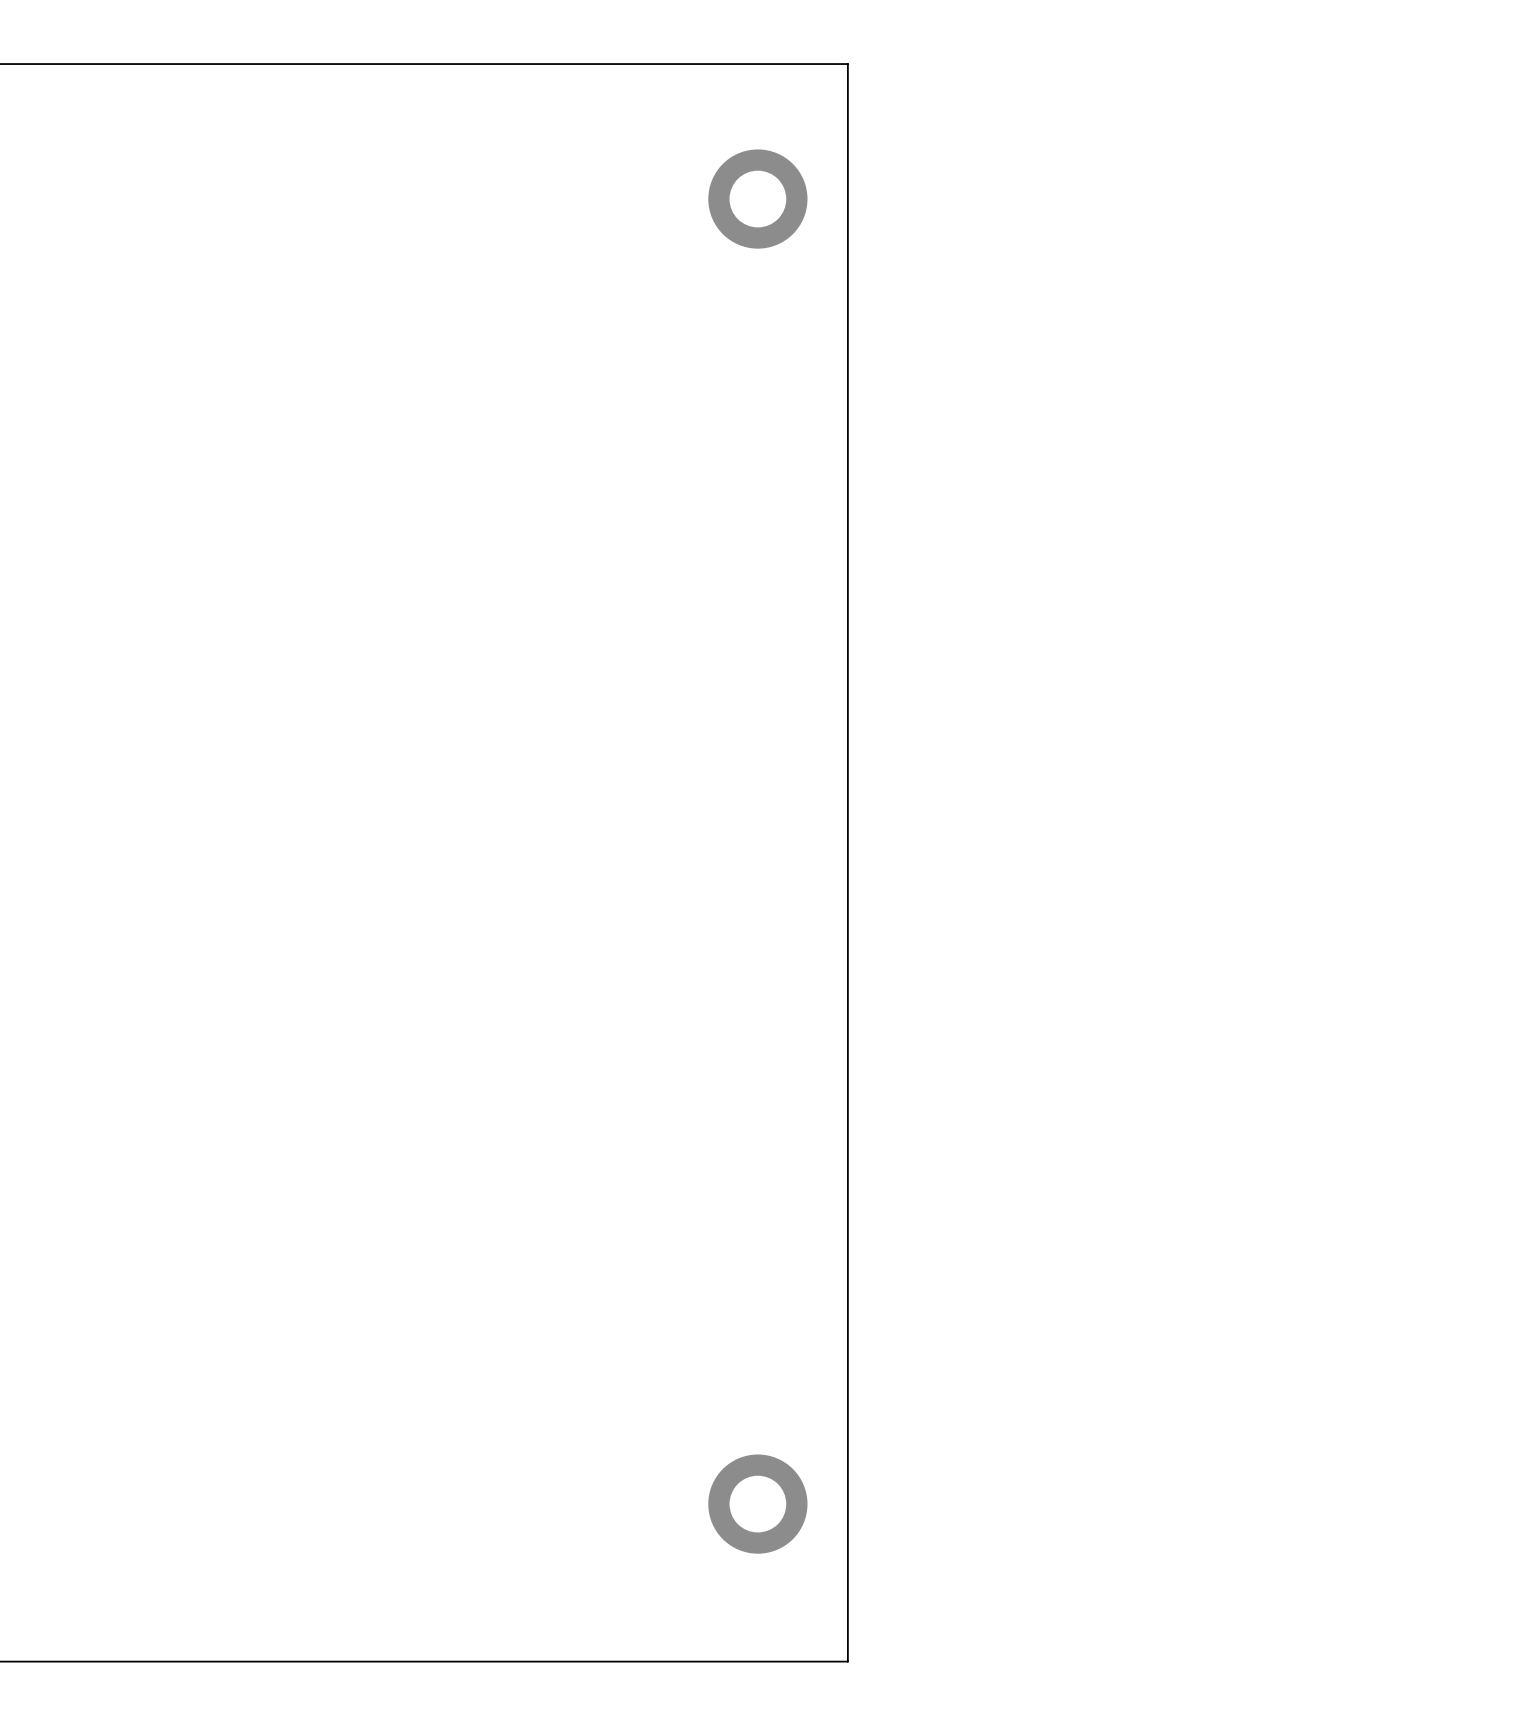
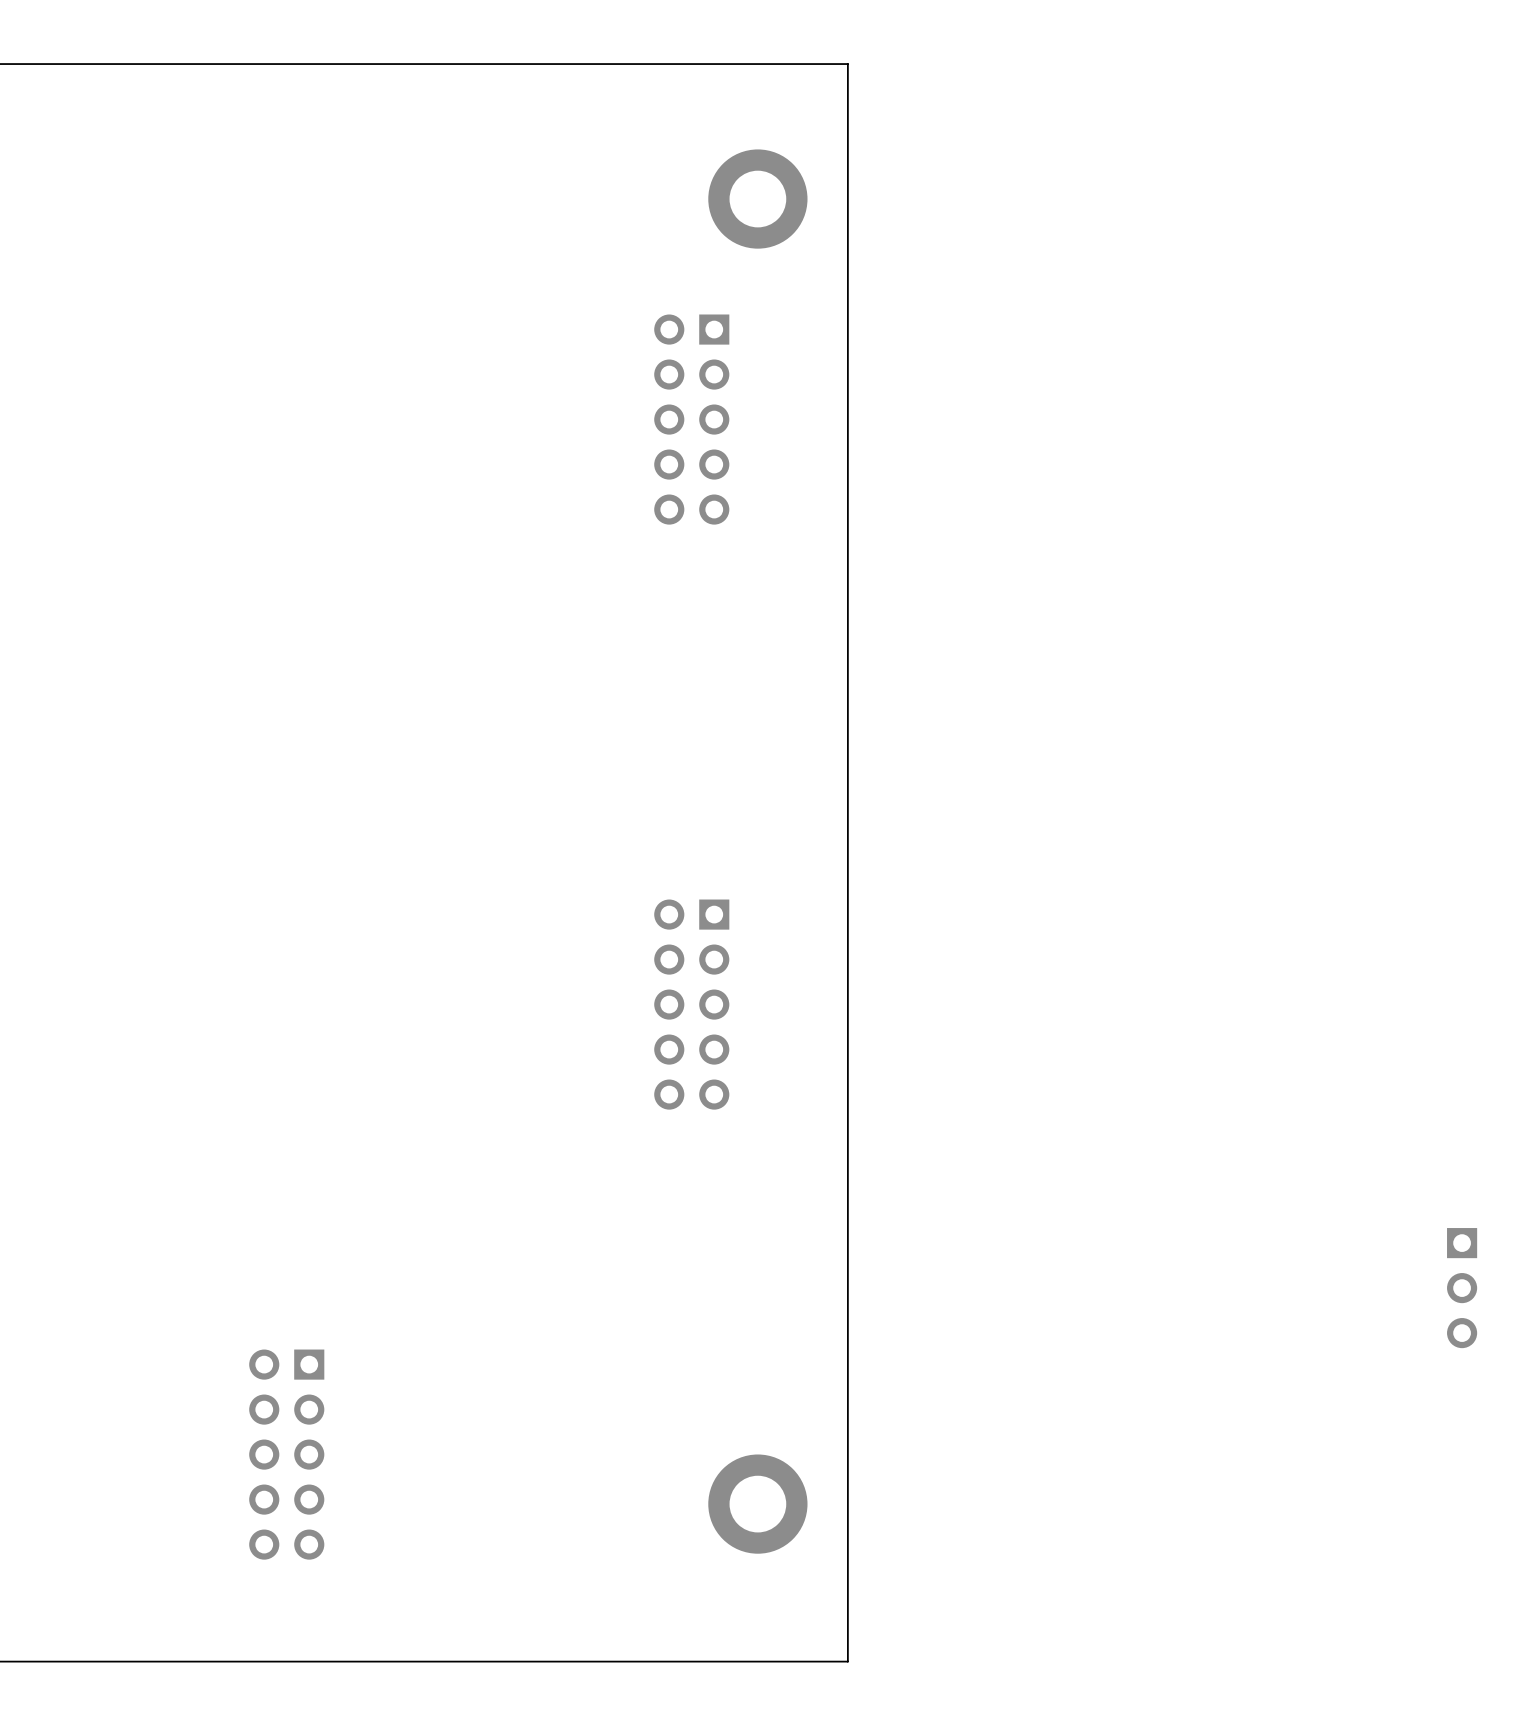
part: none -> (691, 419)
part: none -> (691, 1004)
part: none -> (1462, 1288)
part: none -> (286, 1454)

